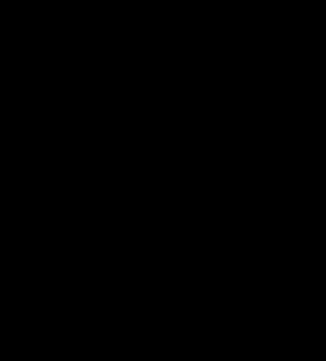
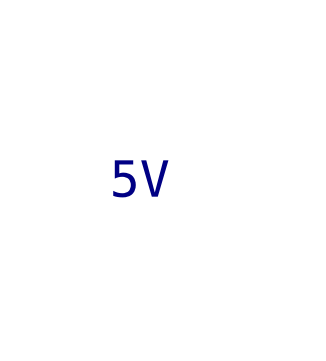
text: none -> 5V (140, 178)

